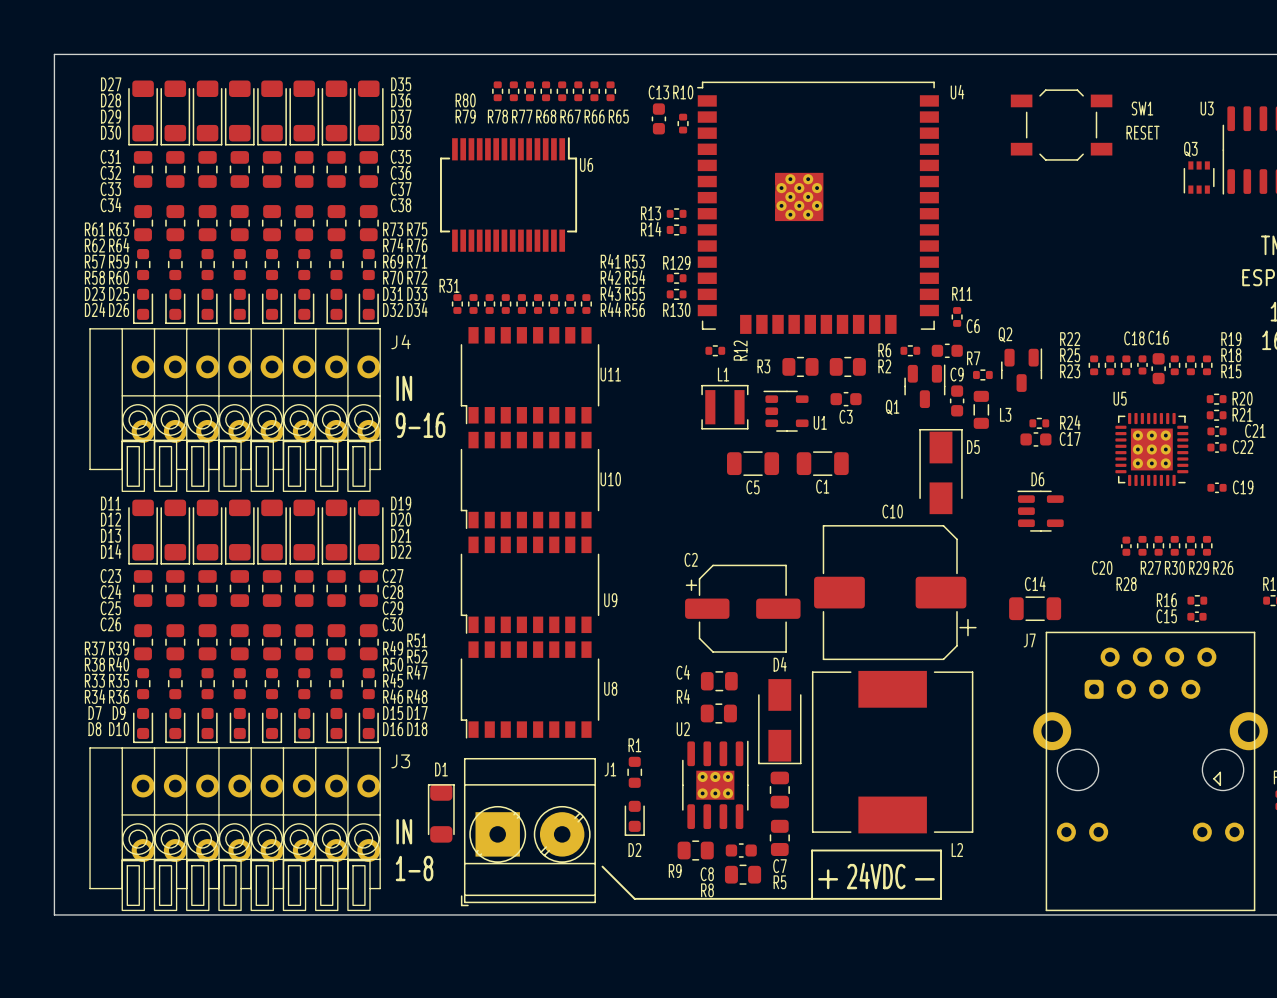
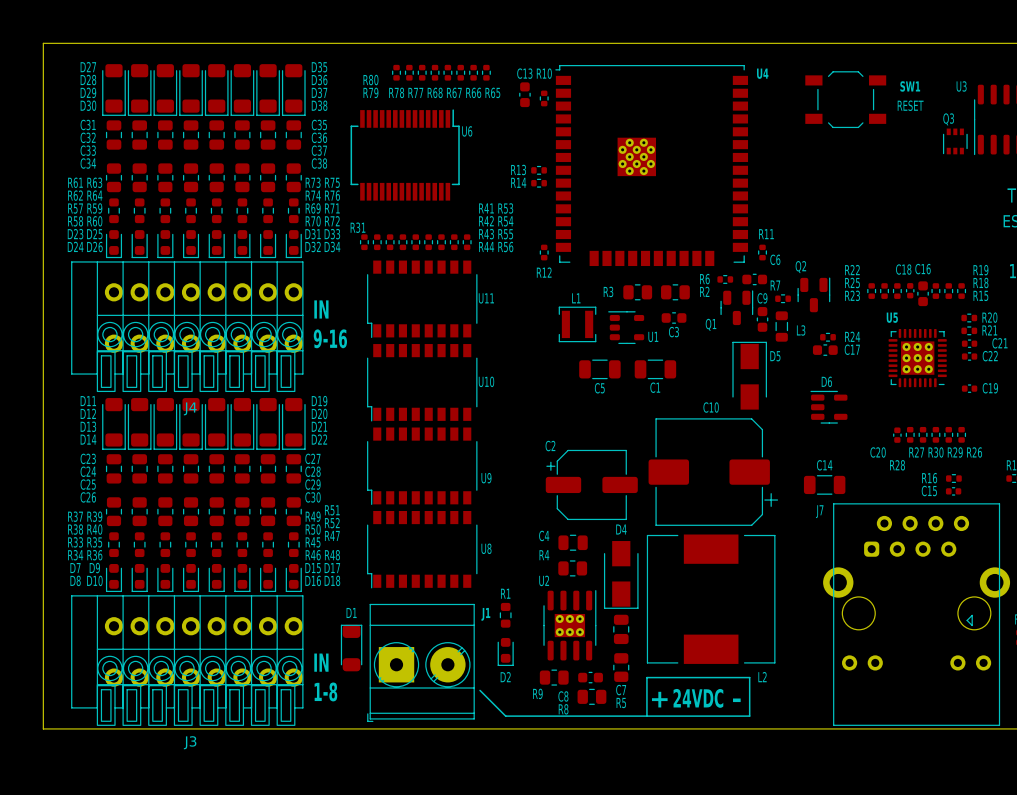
R129: (676, 278) -> none
R130: (676, 294) -> none
J4 name position: J4 (400, 341) -> J4 (190, 408)
R12 rotation: 0° (715, 350) -> 90° clockwise (544, 252)
R12 position: (715, 350) -> (544, 252)
J3 name position: J3 (400, 761) -> J3 (190, 742)

